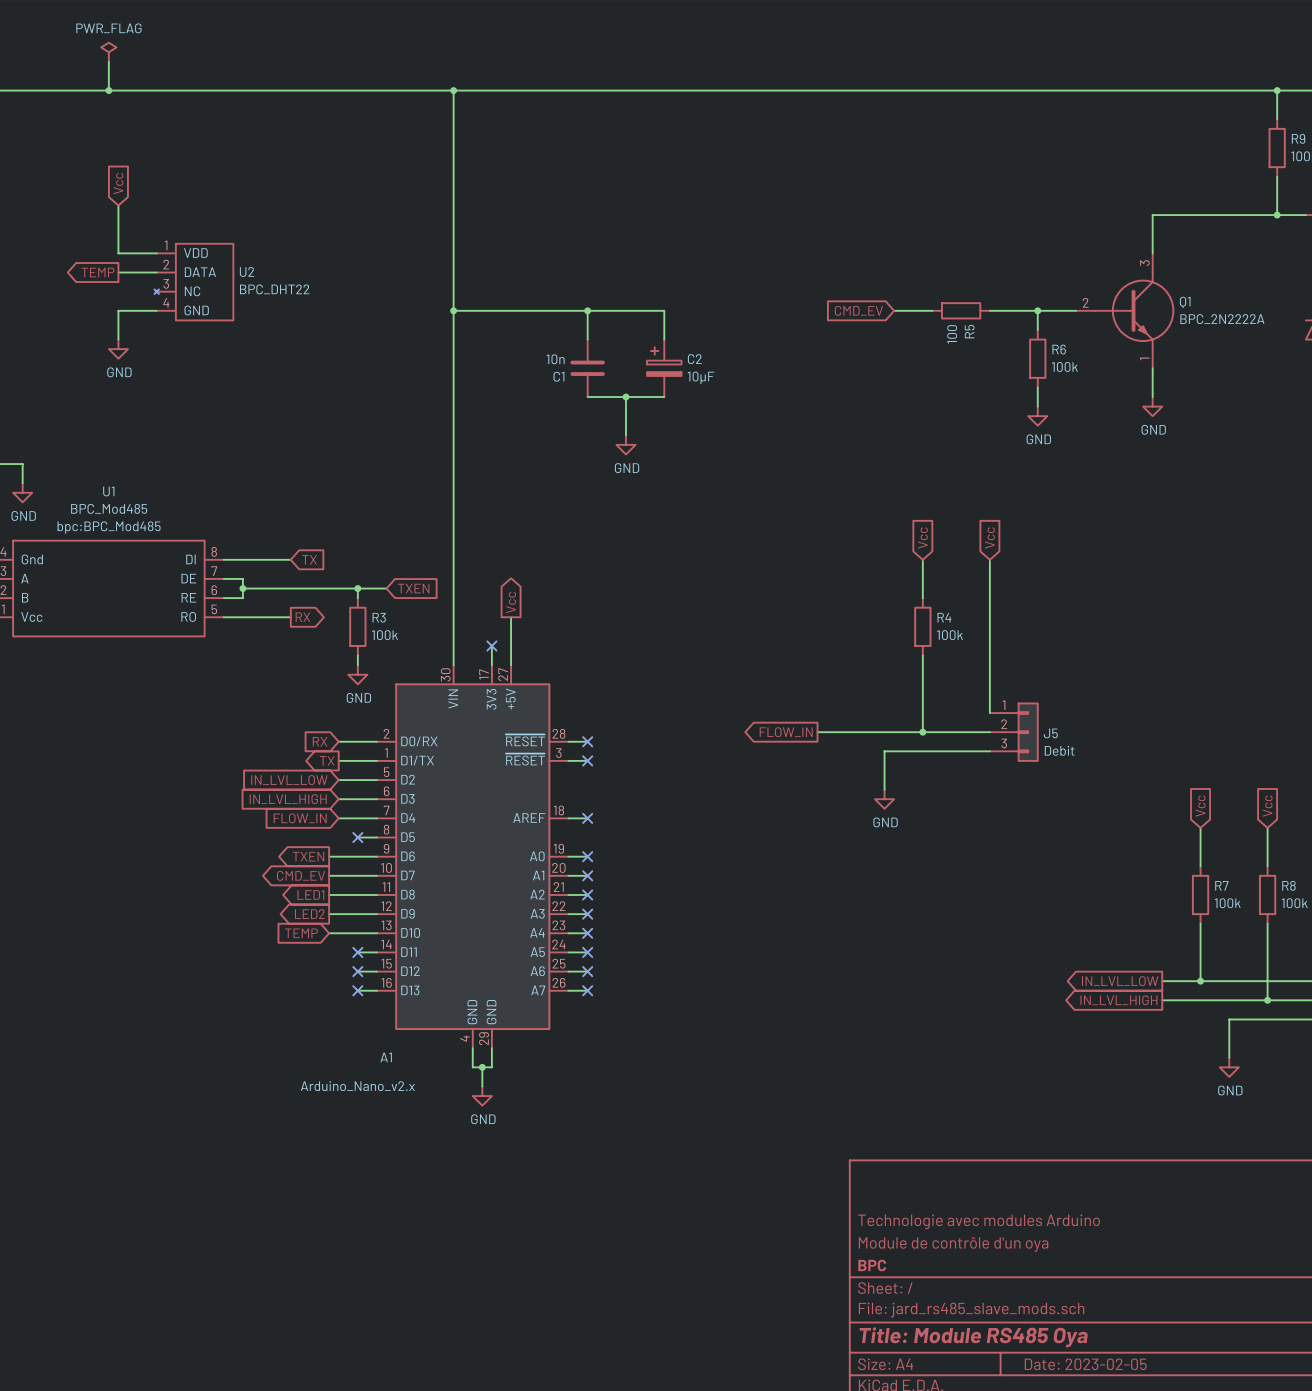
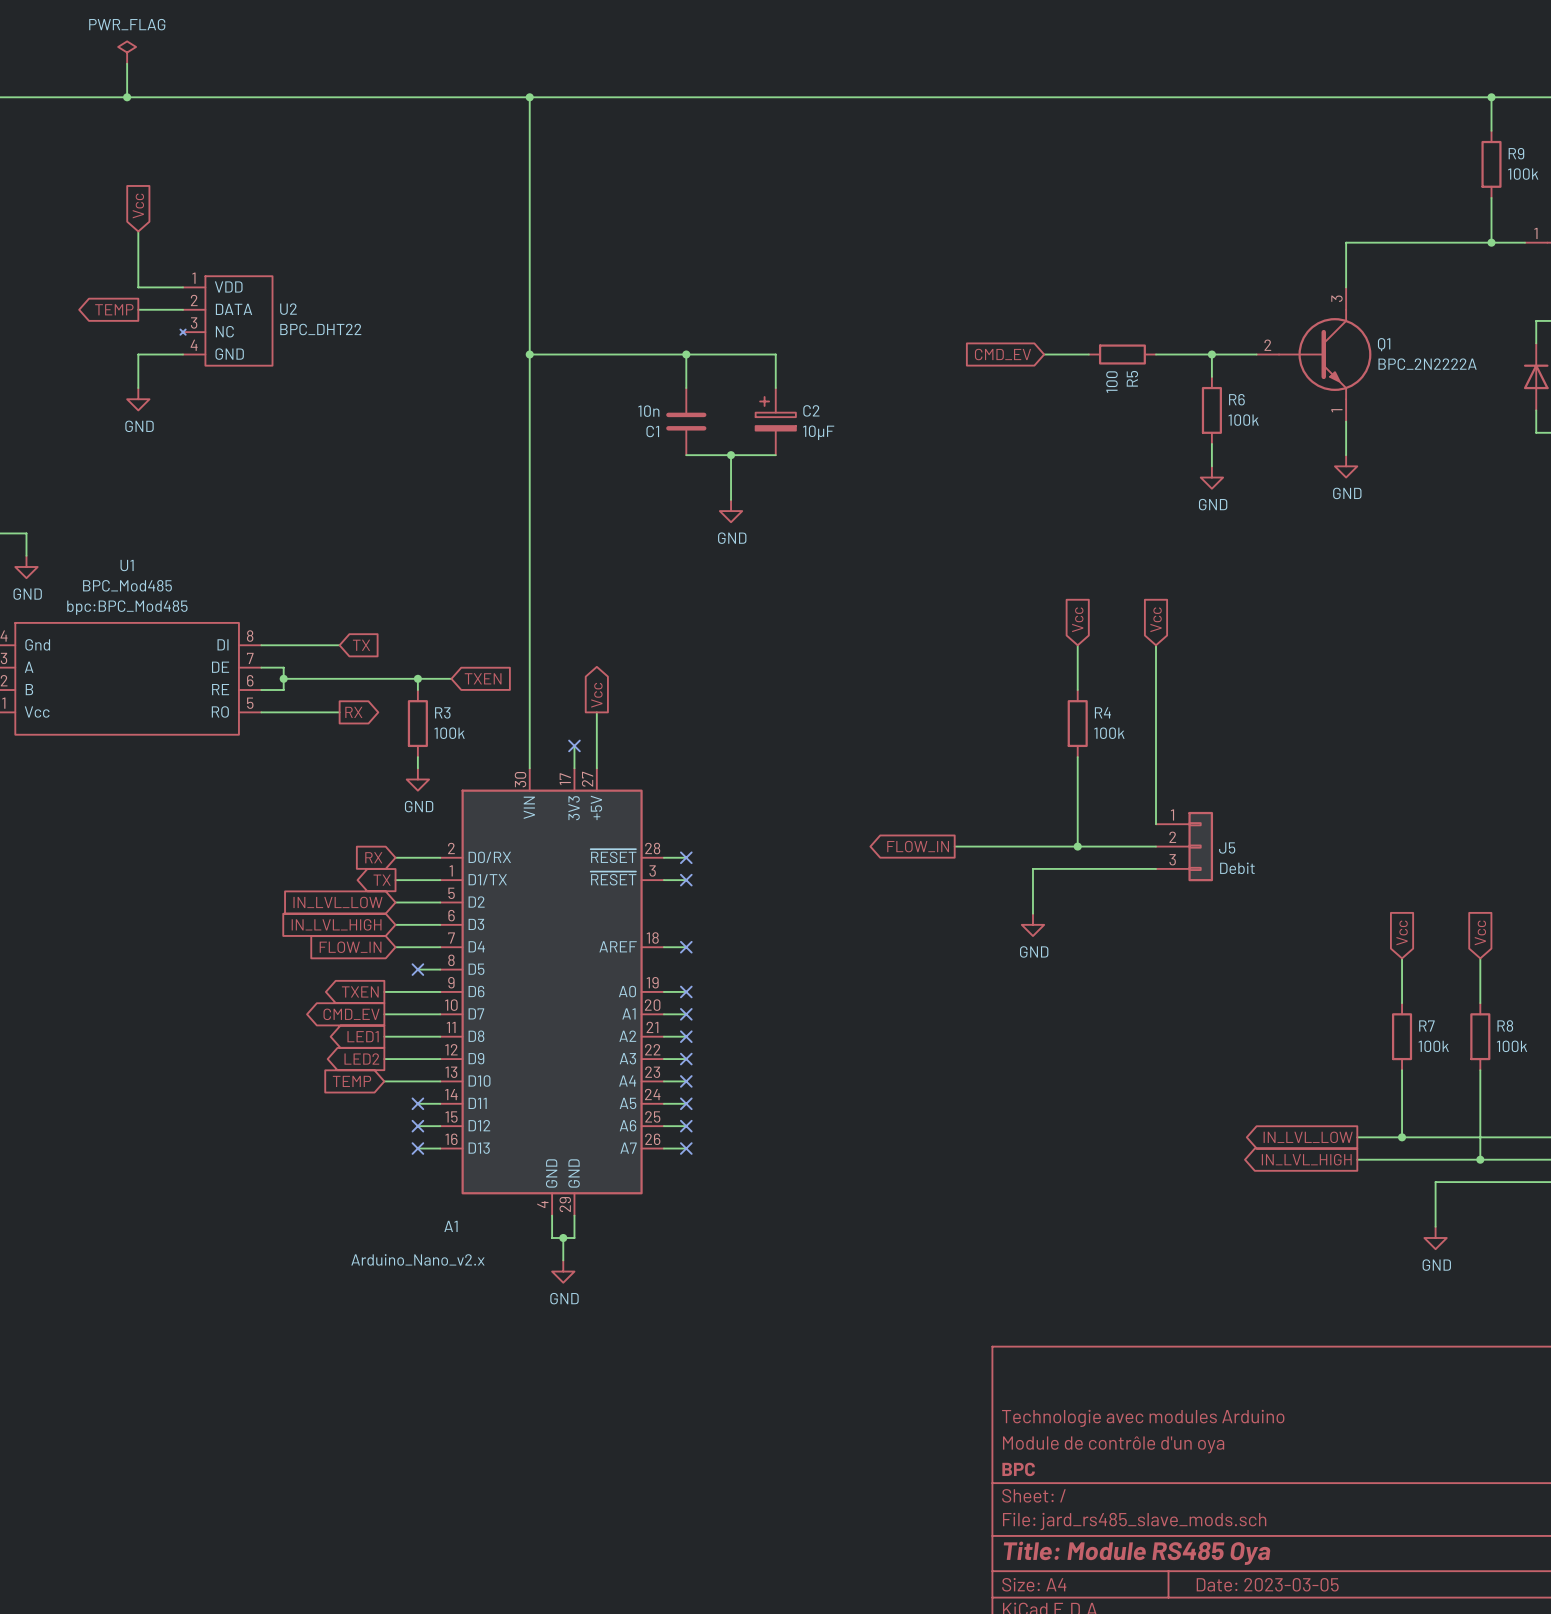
title block: Date: 2023-02-05 (1085, 1364) -> Date: 2023-03-05 (1267, 1584)

